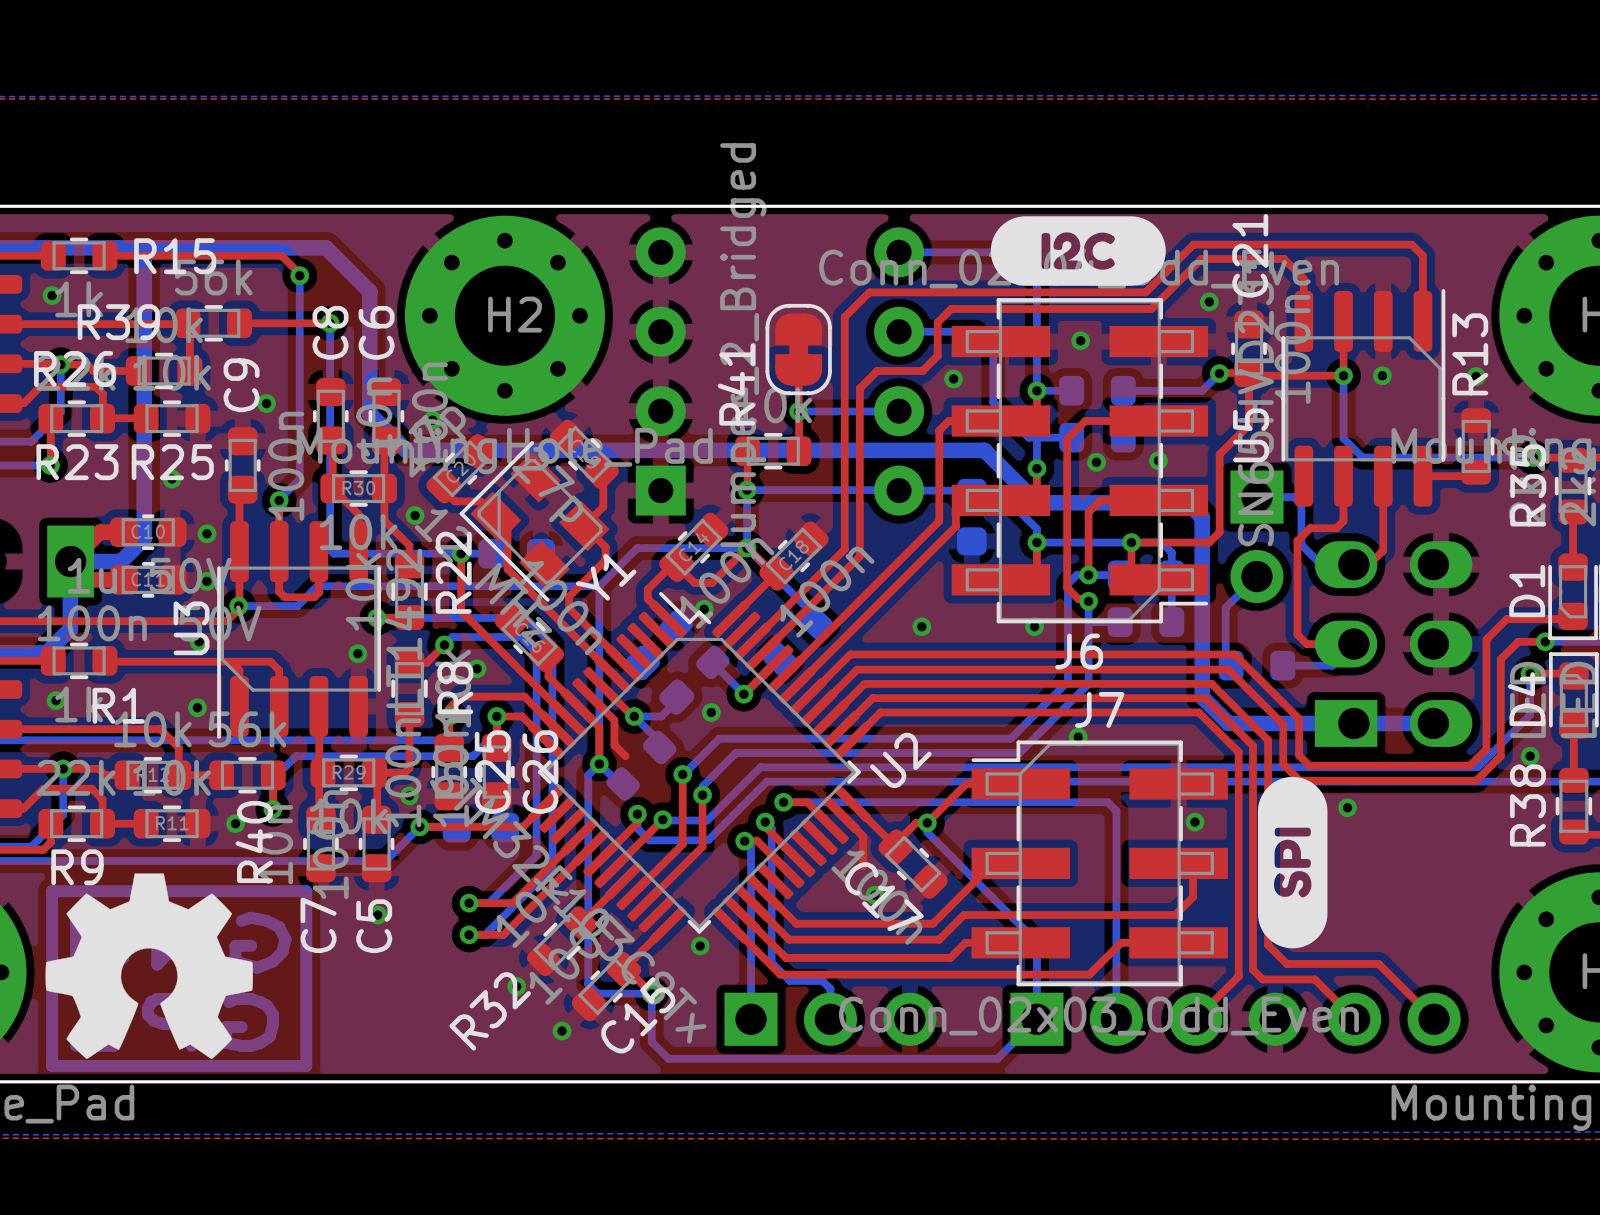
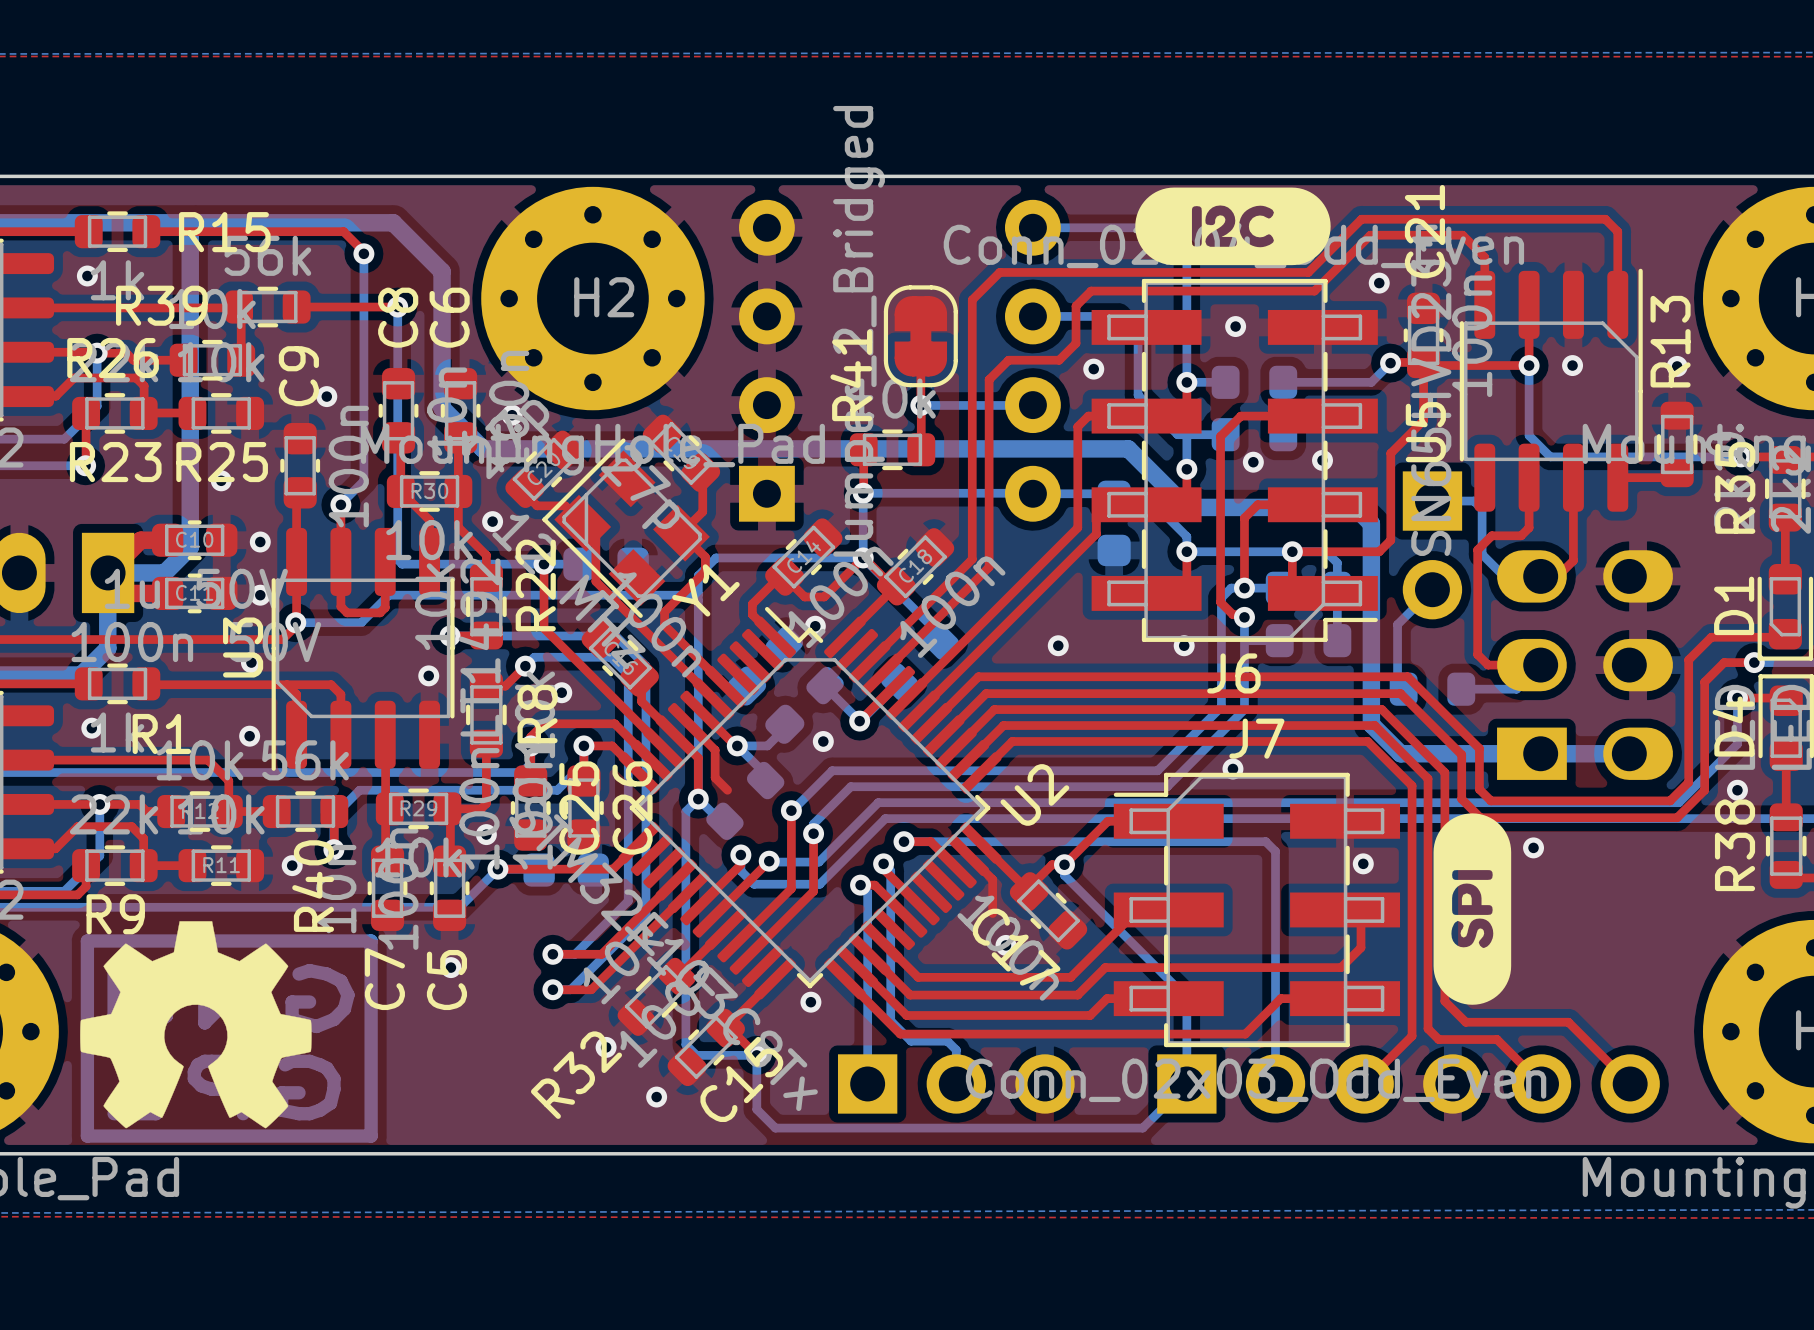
bottom track: (637, 548) (599, 586) (317, 586) -> (698, 594) (388, 595) (383, 600)
bottom track: none -> (740, 557) (716, 557) (698, 575) (698, 600)

